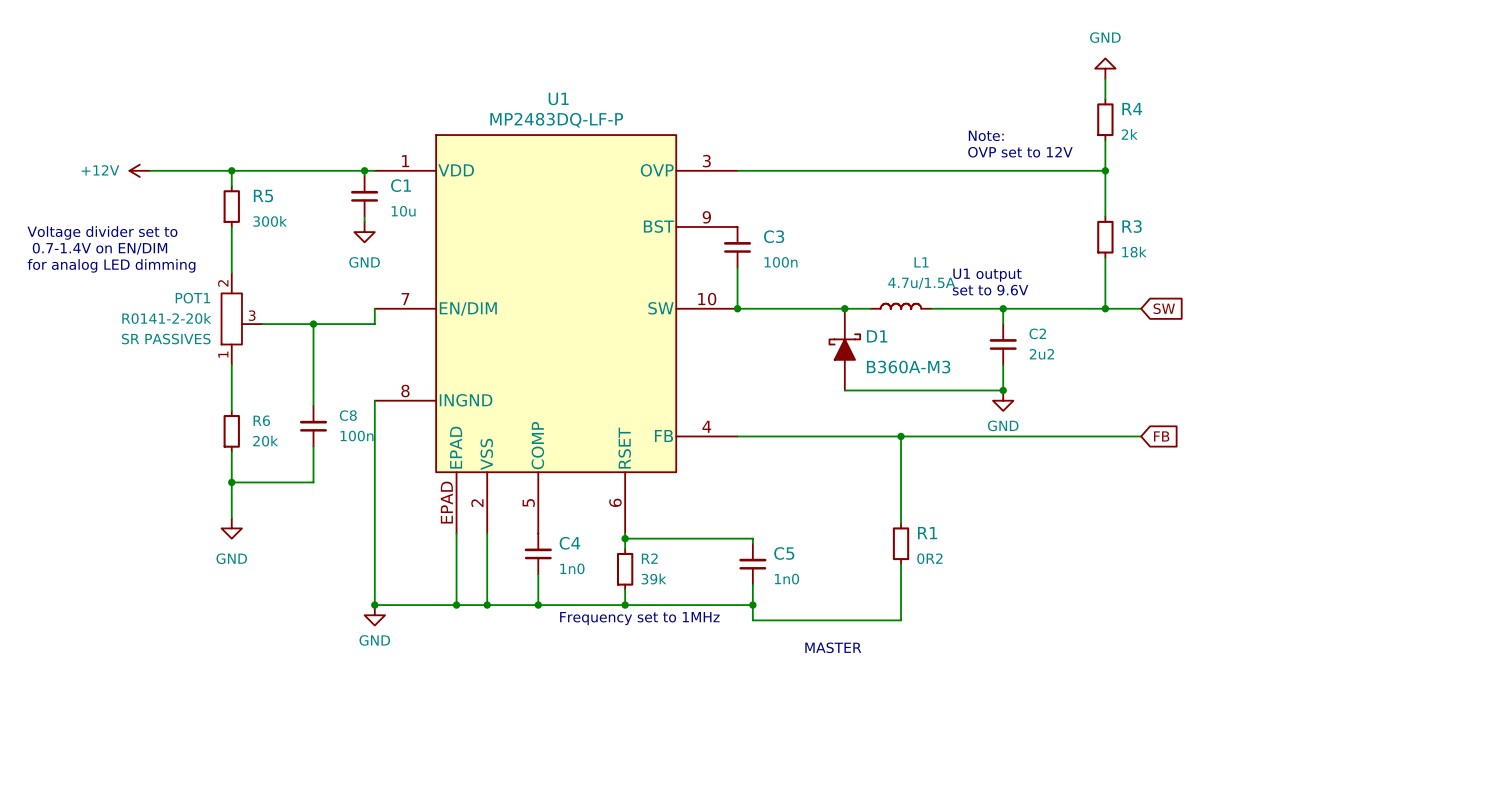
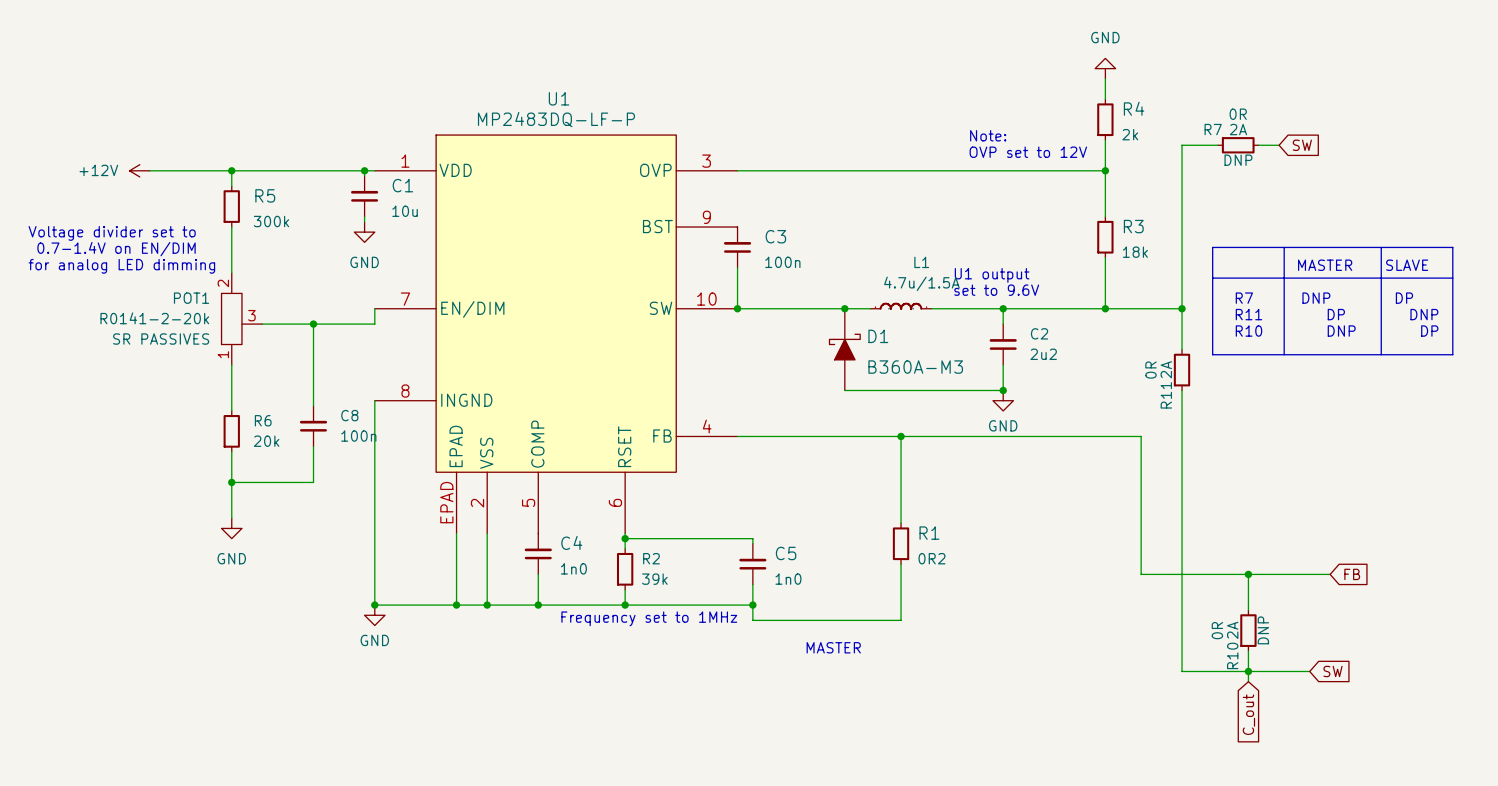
wire: none -> (1217, 145) (1182, 145) (1182, 349)
R7: none -> (1238, 145)
wire: none -> (1258, 145) (1279, 145)
global label: none -> SW (1302, 145)
line: none -> (1212, 247) (1212, 354) (1452, 354) (1452, 247) (1212, 247)
line: none -> (1284, 247) (1284, 354)
line: none -> (1381, 247) (1381, 354)
text: none -> MASTER SLAVE (1363, 265)
line: none -> (1212, 278) (1452, 278)
text: none -> R7 DNP DP (1324, 298)
wire: none -> (1141, 308) (1182, 308)
global label: SW (1164, 308) -> none
junction: none -> (1182, 308)
text: none -> R11 DP DNP (1337, 314)
text: none -> R10 DNP DP (1337, 331)
R11: none -> (1182, 370)
wire: none -> (1182, 390) (1182, 671) (1309, 671)
wire: none -> (1141, 436) (1141, 574) (1330, 574)
global label: FB (1161, 436) -> none
wire: none -> (1248, 574) (1248, 610)
junction: none -> (1248, 574)
global label: none -> FB (1352, 574)
R10: none -> (1248, 630)
wire: none -> (1248, 651) (1248, 681)
junction: none -> (1248, 671)
global label: none -> SW (1332, 671)
global label: none -> C_out (1248, 714)

